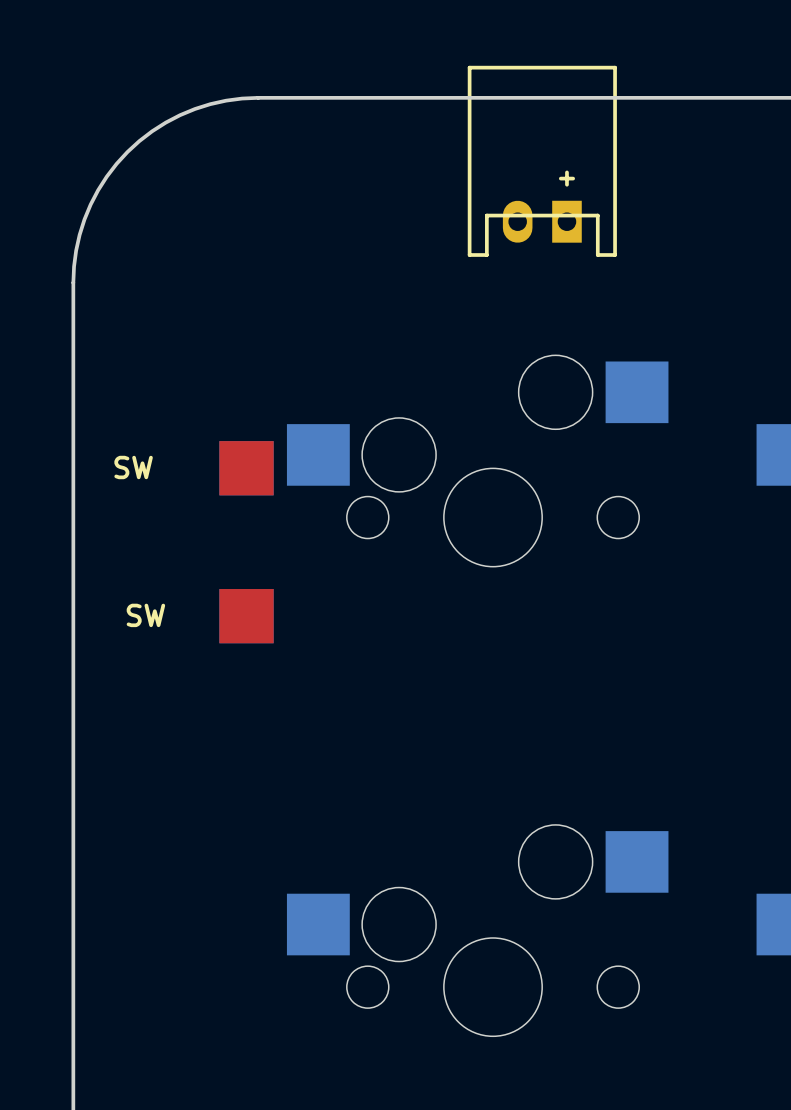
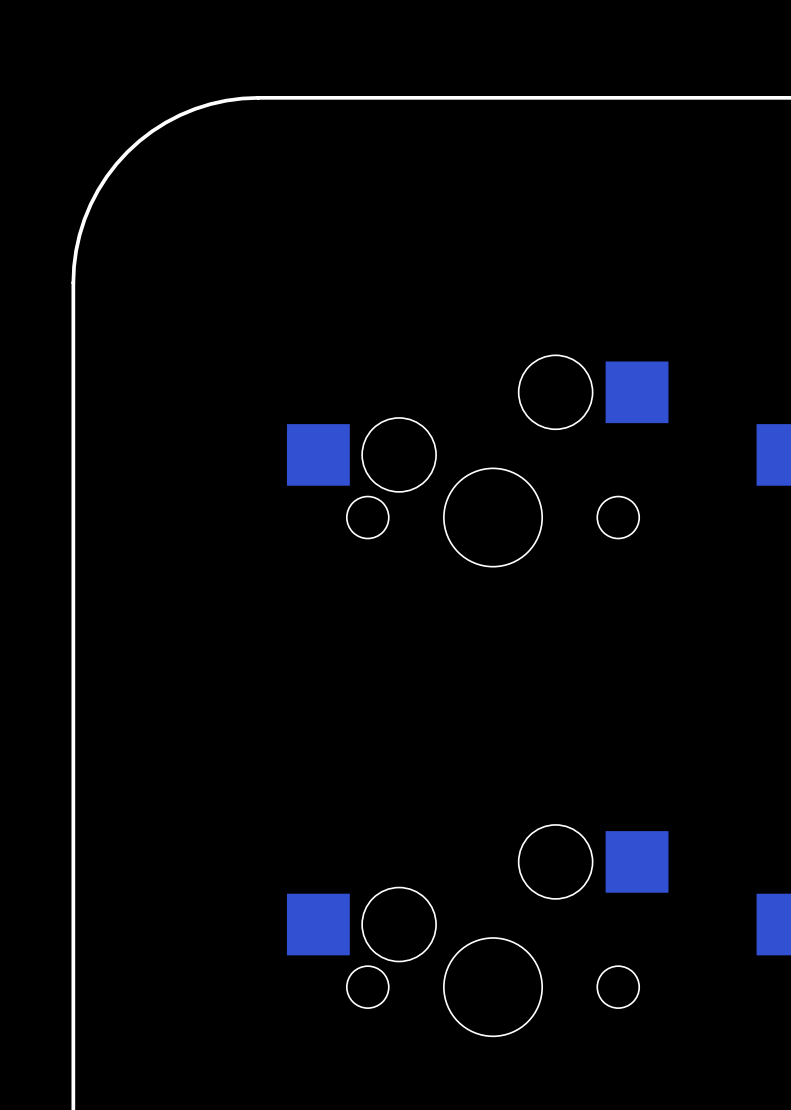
part: (542, 161) -> none
part: (246, 468) -> none
part: (246, 616) -> none

